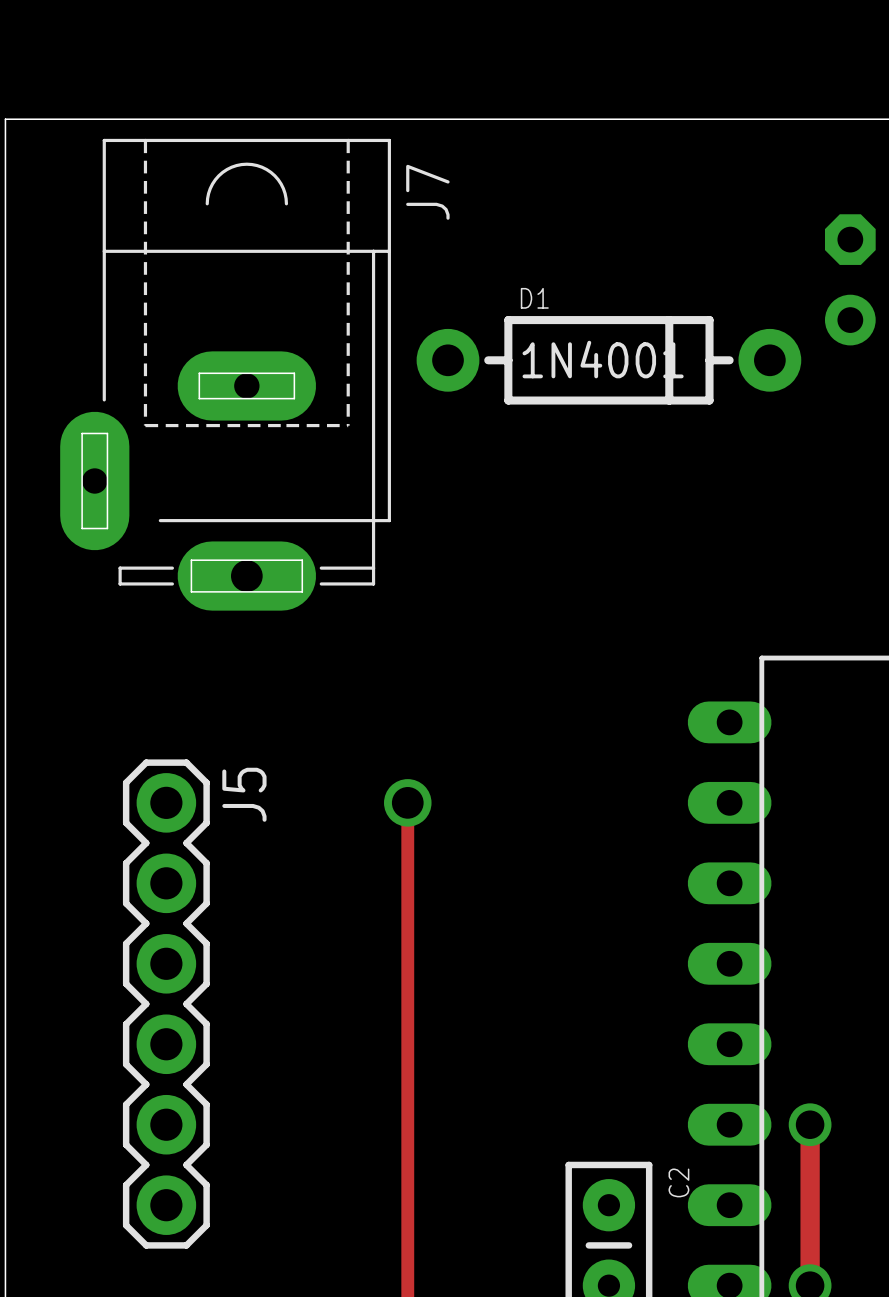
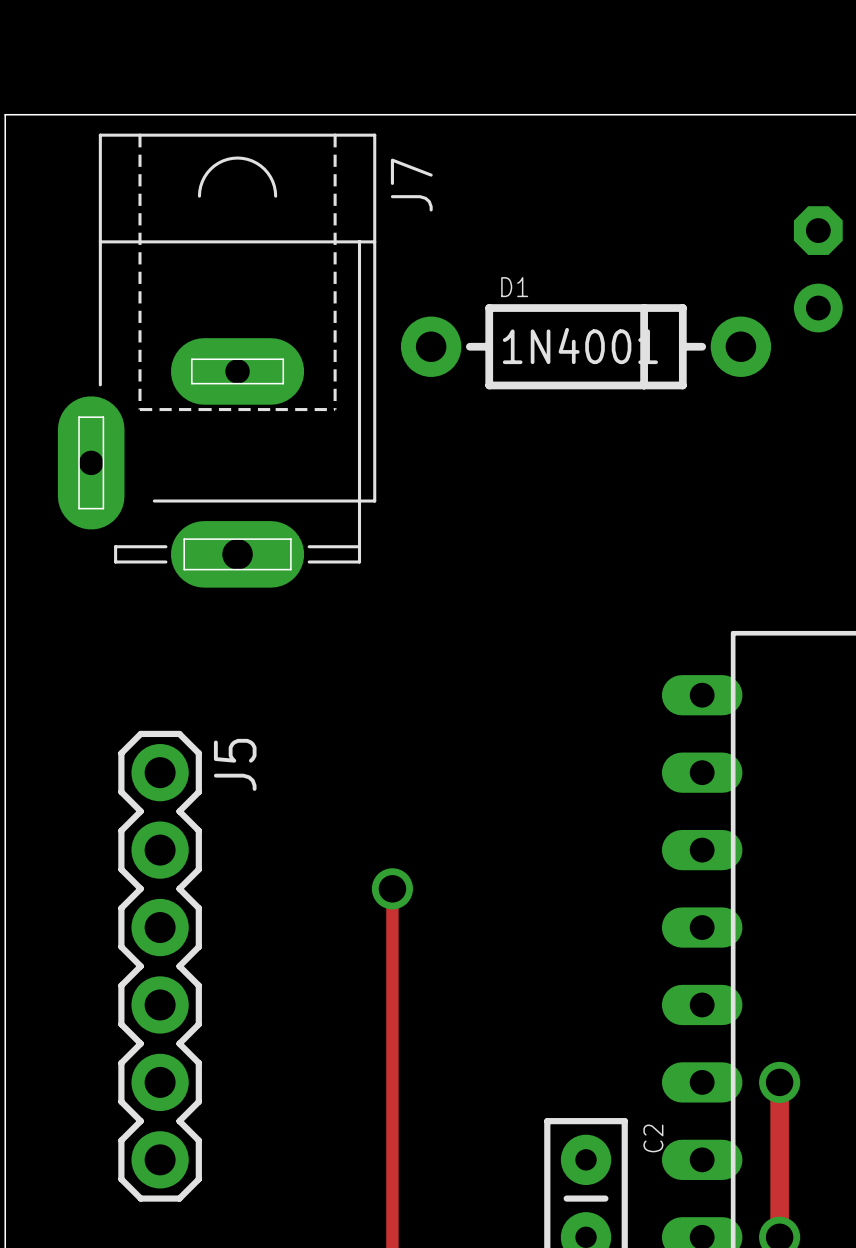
track: (407, 802) (407, 923) -> none
via: (407, 802) -> none
via: none -> (392, 888)

